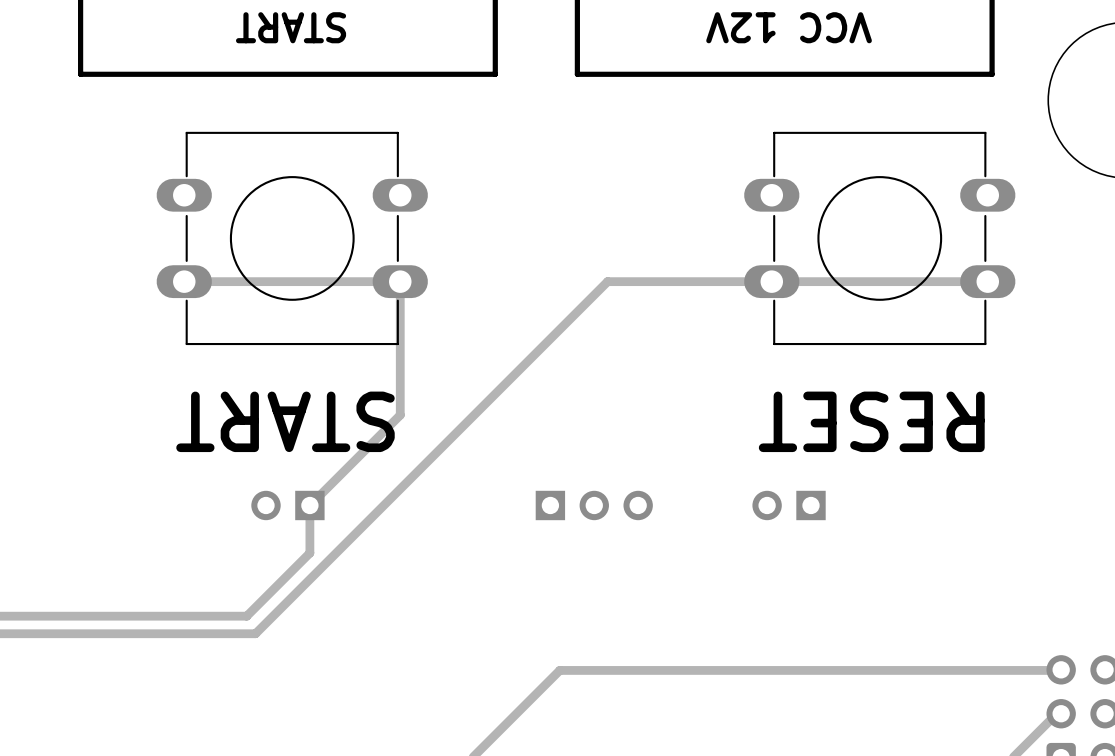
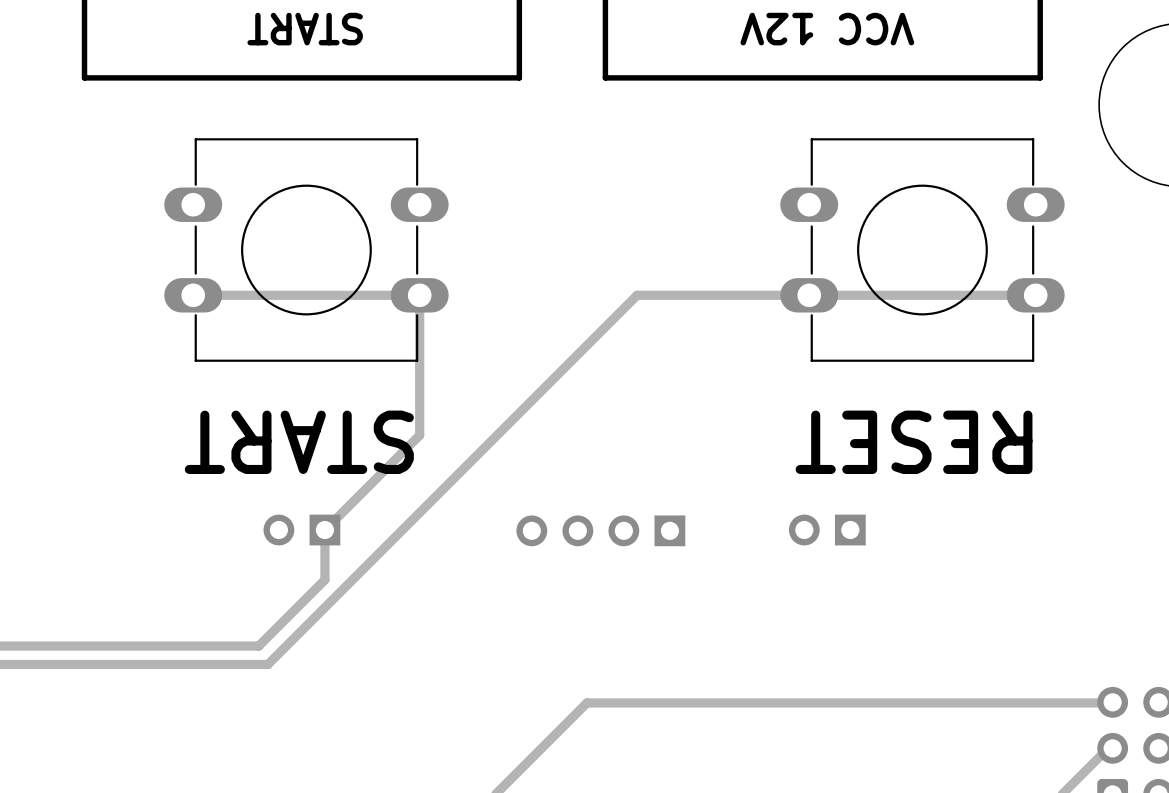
part: (594, 505) -> none
part: none -> (600, 530)

